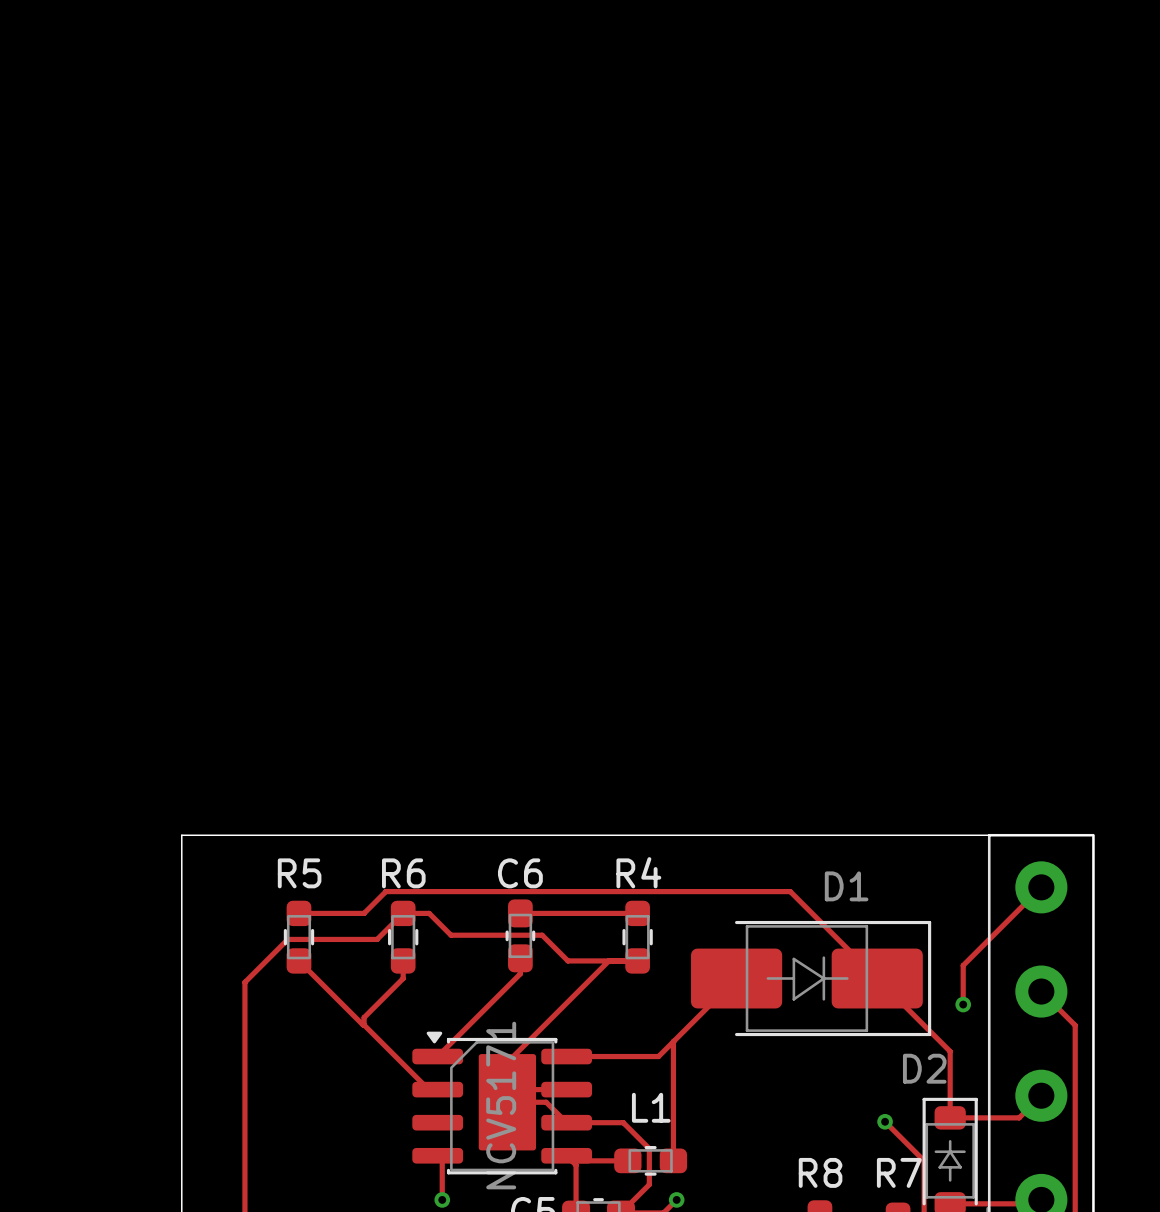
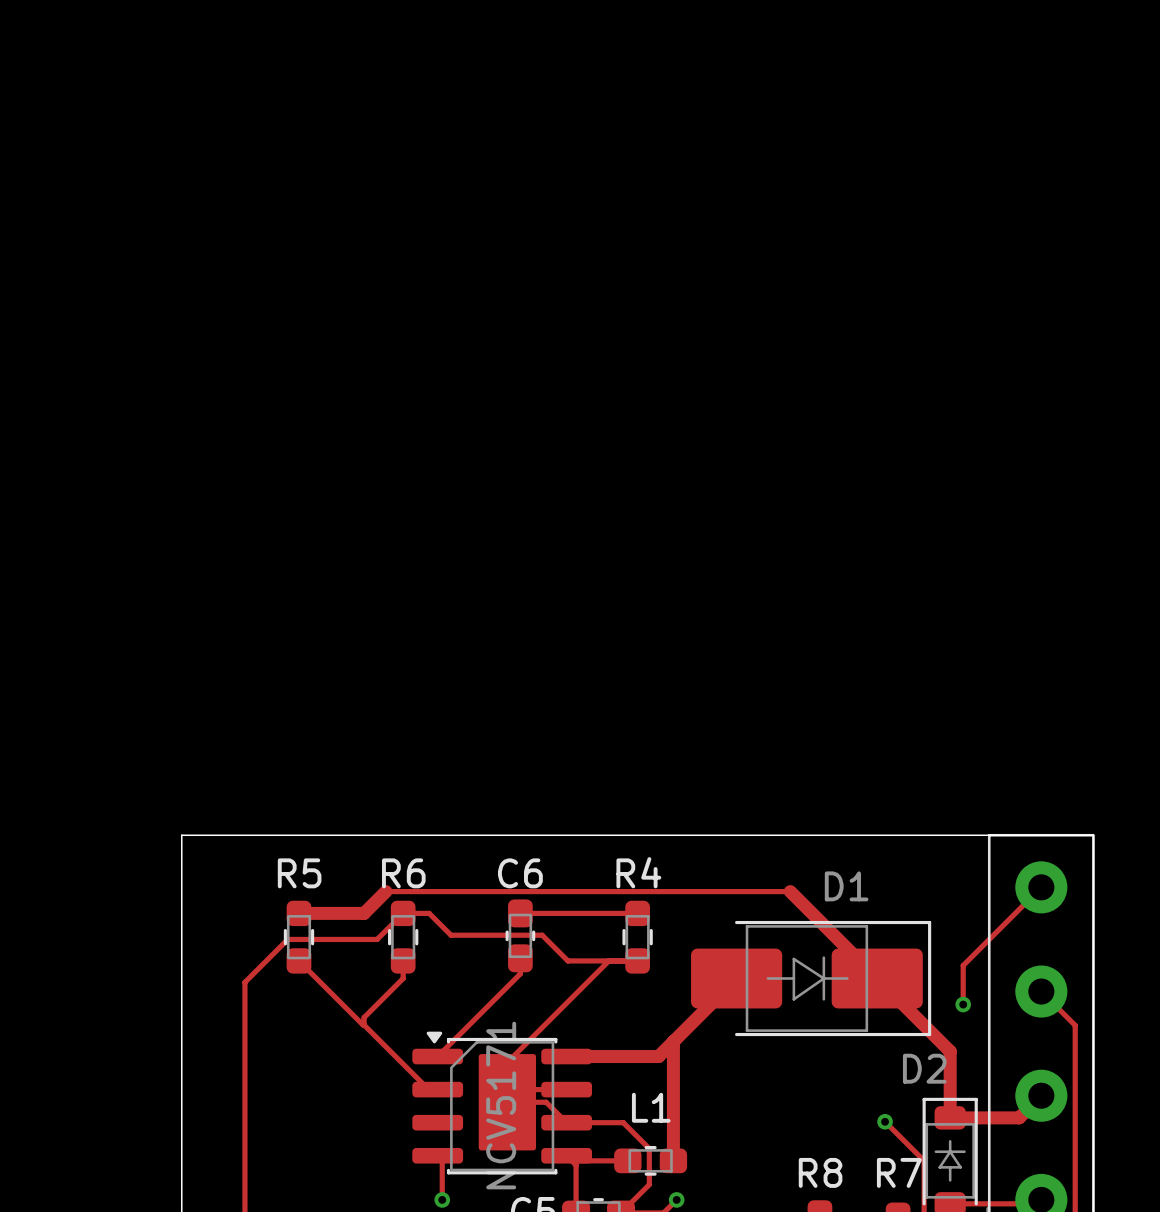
track width: thin (385, 891) (364, 913) (298, 913) -> thick (385, 891) (364, 913) (298, 913)
track width: thin (790, 891) (950, 1051) (950, 1117) -> thick (790, 891) (950, 1051) (950, 1117)
track width: thin (736, 978) (658, 1056) (566, 1056) -> thick (736, 978) (658, 1056) (566, 1056)
track width: thin (673, 1041) (673, 1160) -> thick (673, 1041) (673, 1160)
track width: thin (1041, 1095) (1019, 1117) (963, 1117) -> thick (1041, 1095) (1019, 1117) (963, 1117)

